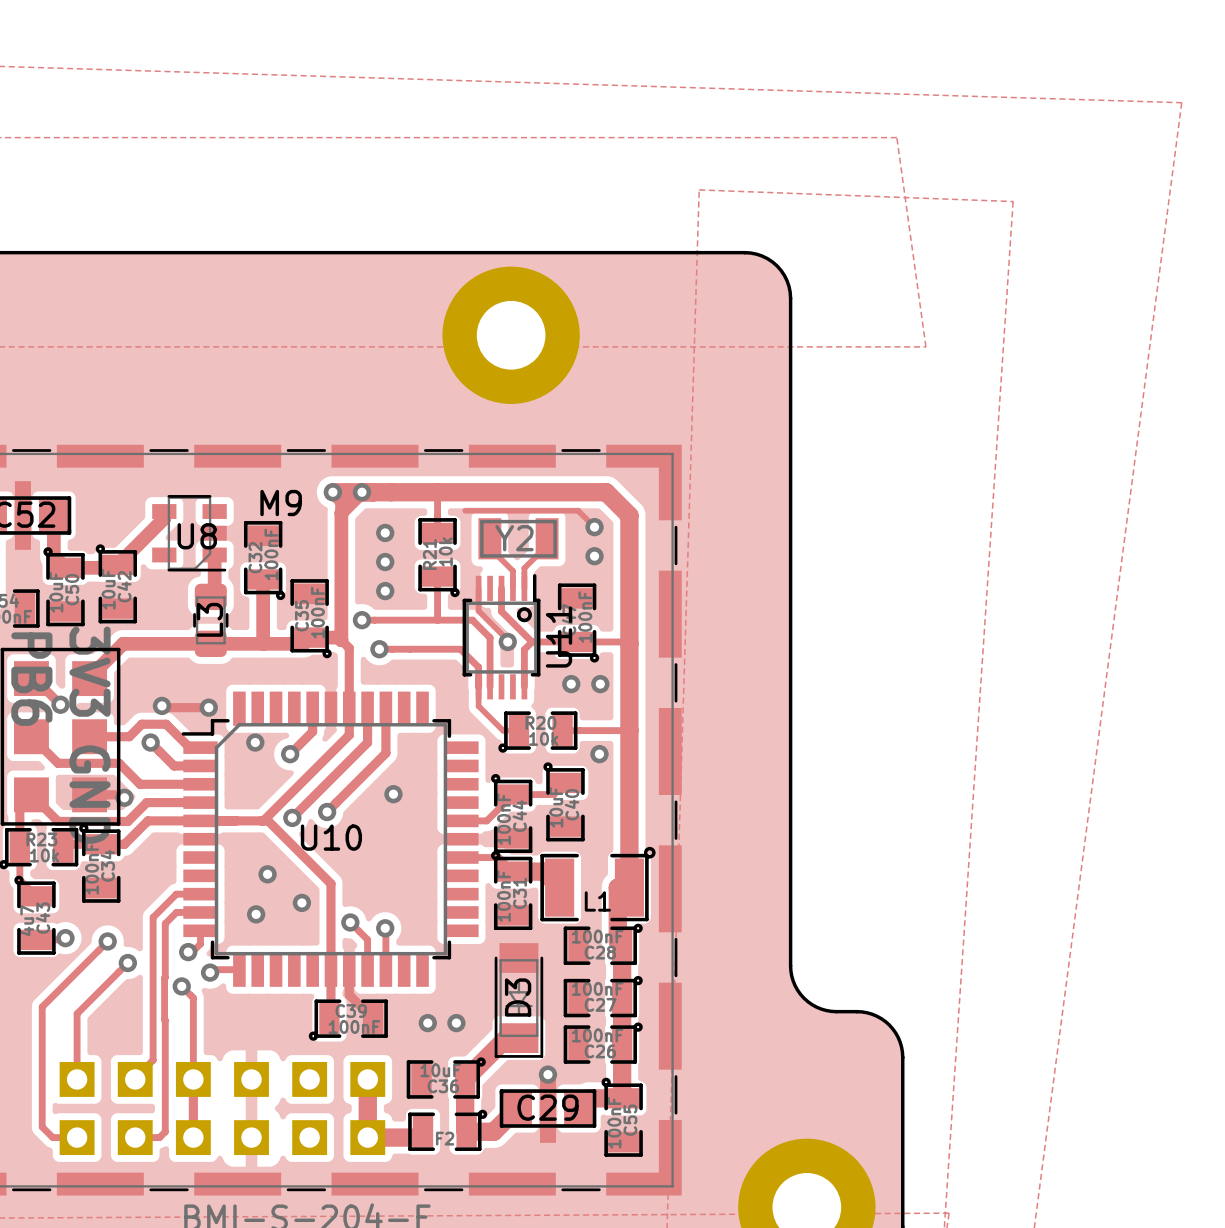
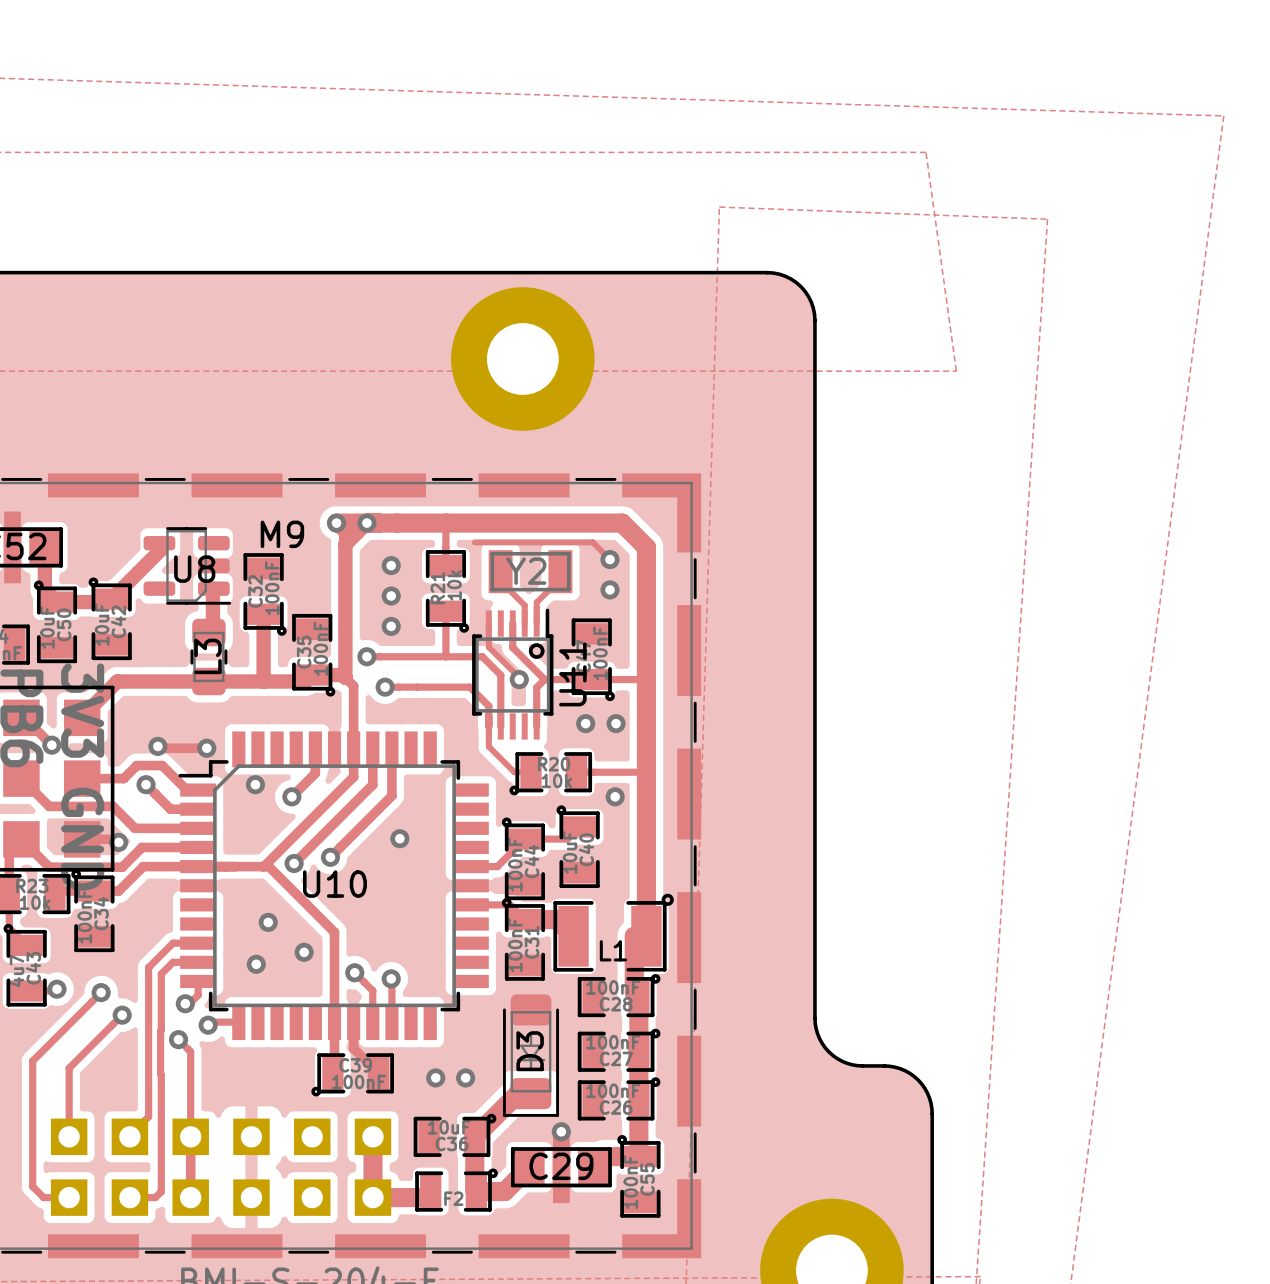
U8 footprint: [152, 495, 227, 572] -> [143, 527, 232, 605]
D3 footprint: [494, 943, 544, 1058] -> [503, 994, 559, 1117]

